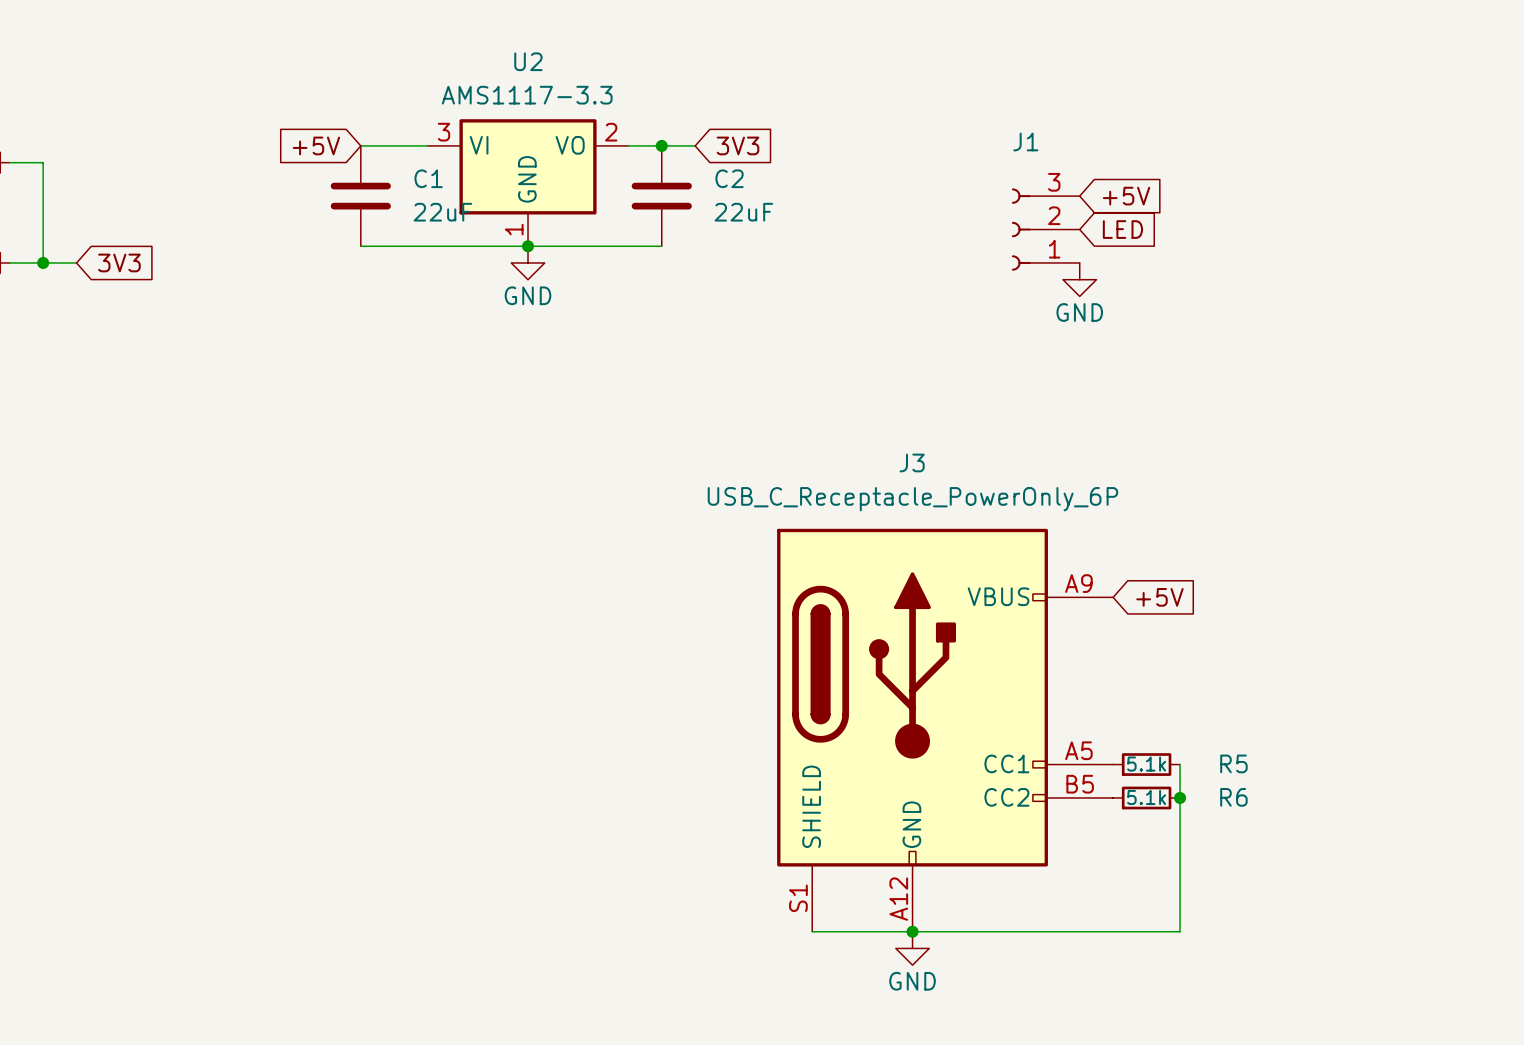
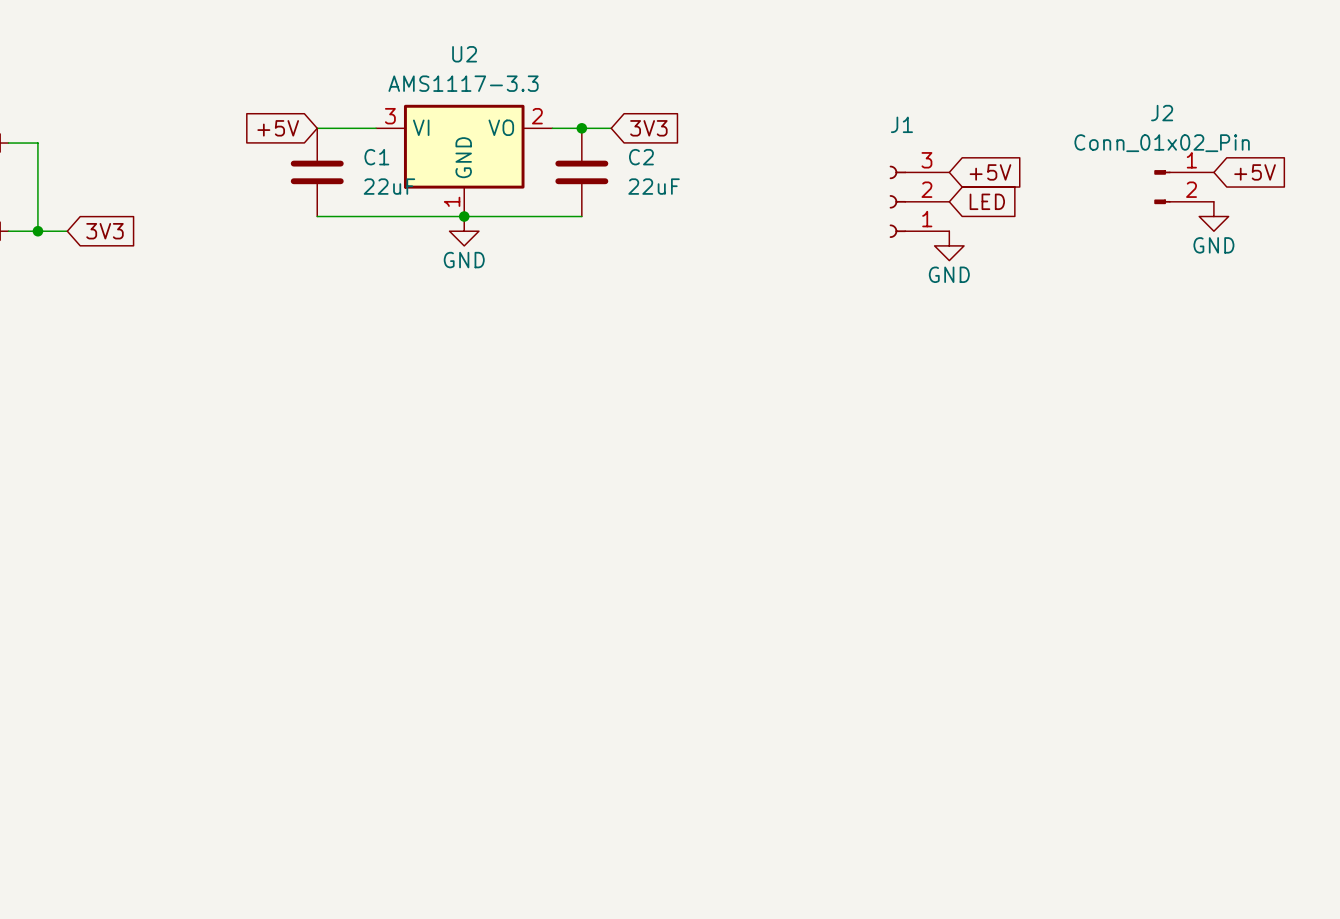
global label: none -> +5V (1255, 172)
J2: none -> Conn_01x02_Pin (1184, 187)
power symbol: none -> GND (1213, 216)
global label: +5V (1159, 597) -> none
J3: USB_C_Receptacle_PowerOnly_6P (945, 730) -> none
R5: 5.1k (1146, 764) -> none
wire: (1180, 764) (1180, 931) (812, 931) -> none
R6: 5.1k (1146, 797) -> none
junction: (1180, 797) -> none
junction: (912, 931) -> none
power symbol: GND (912, 948) -> none

